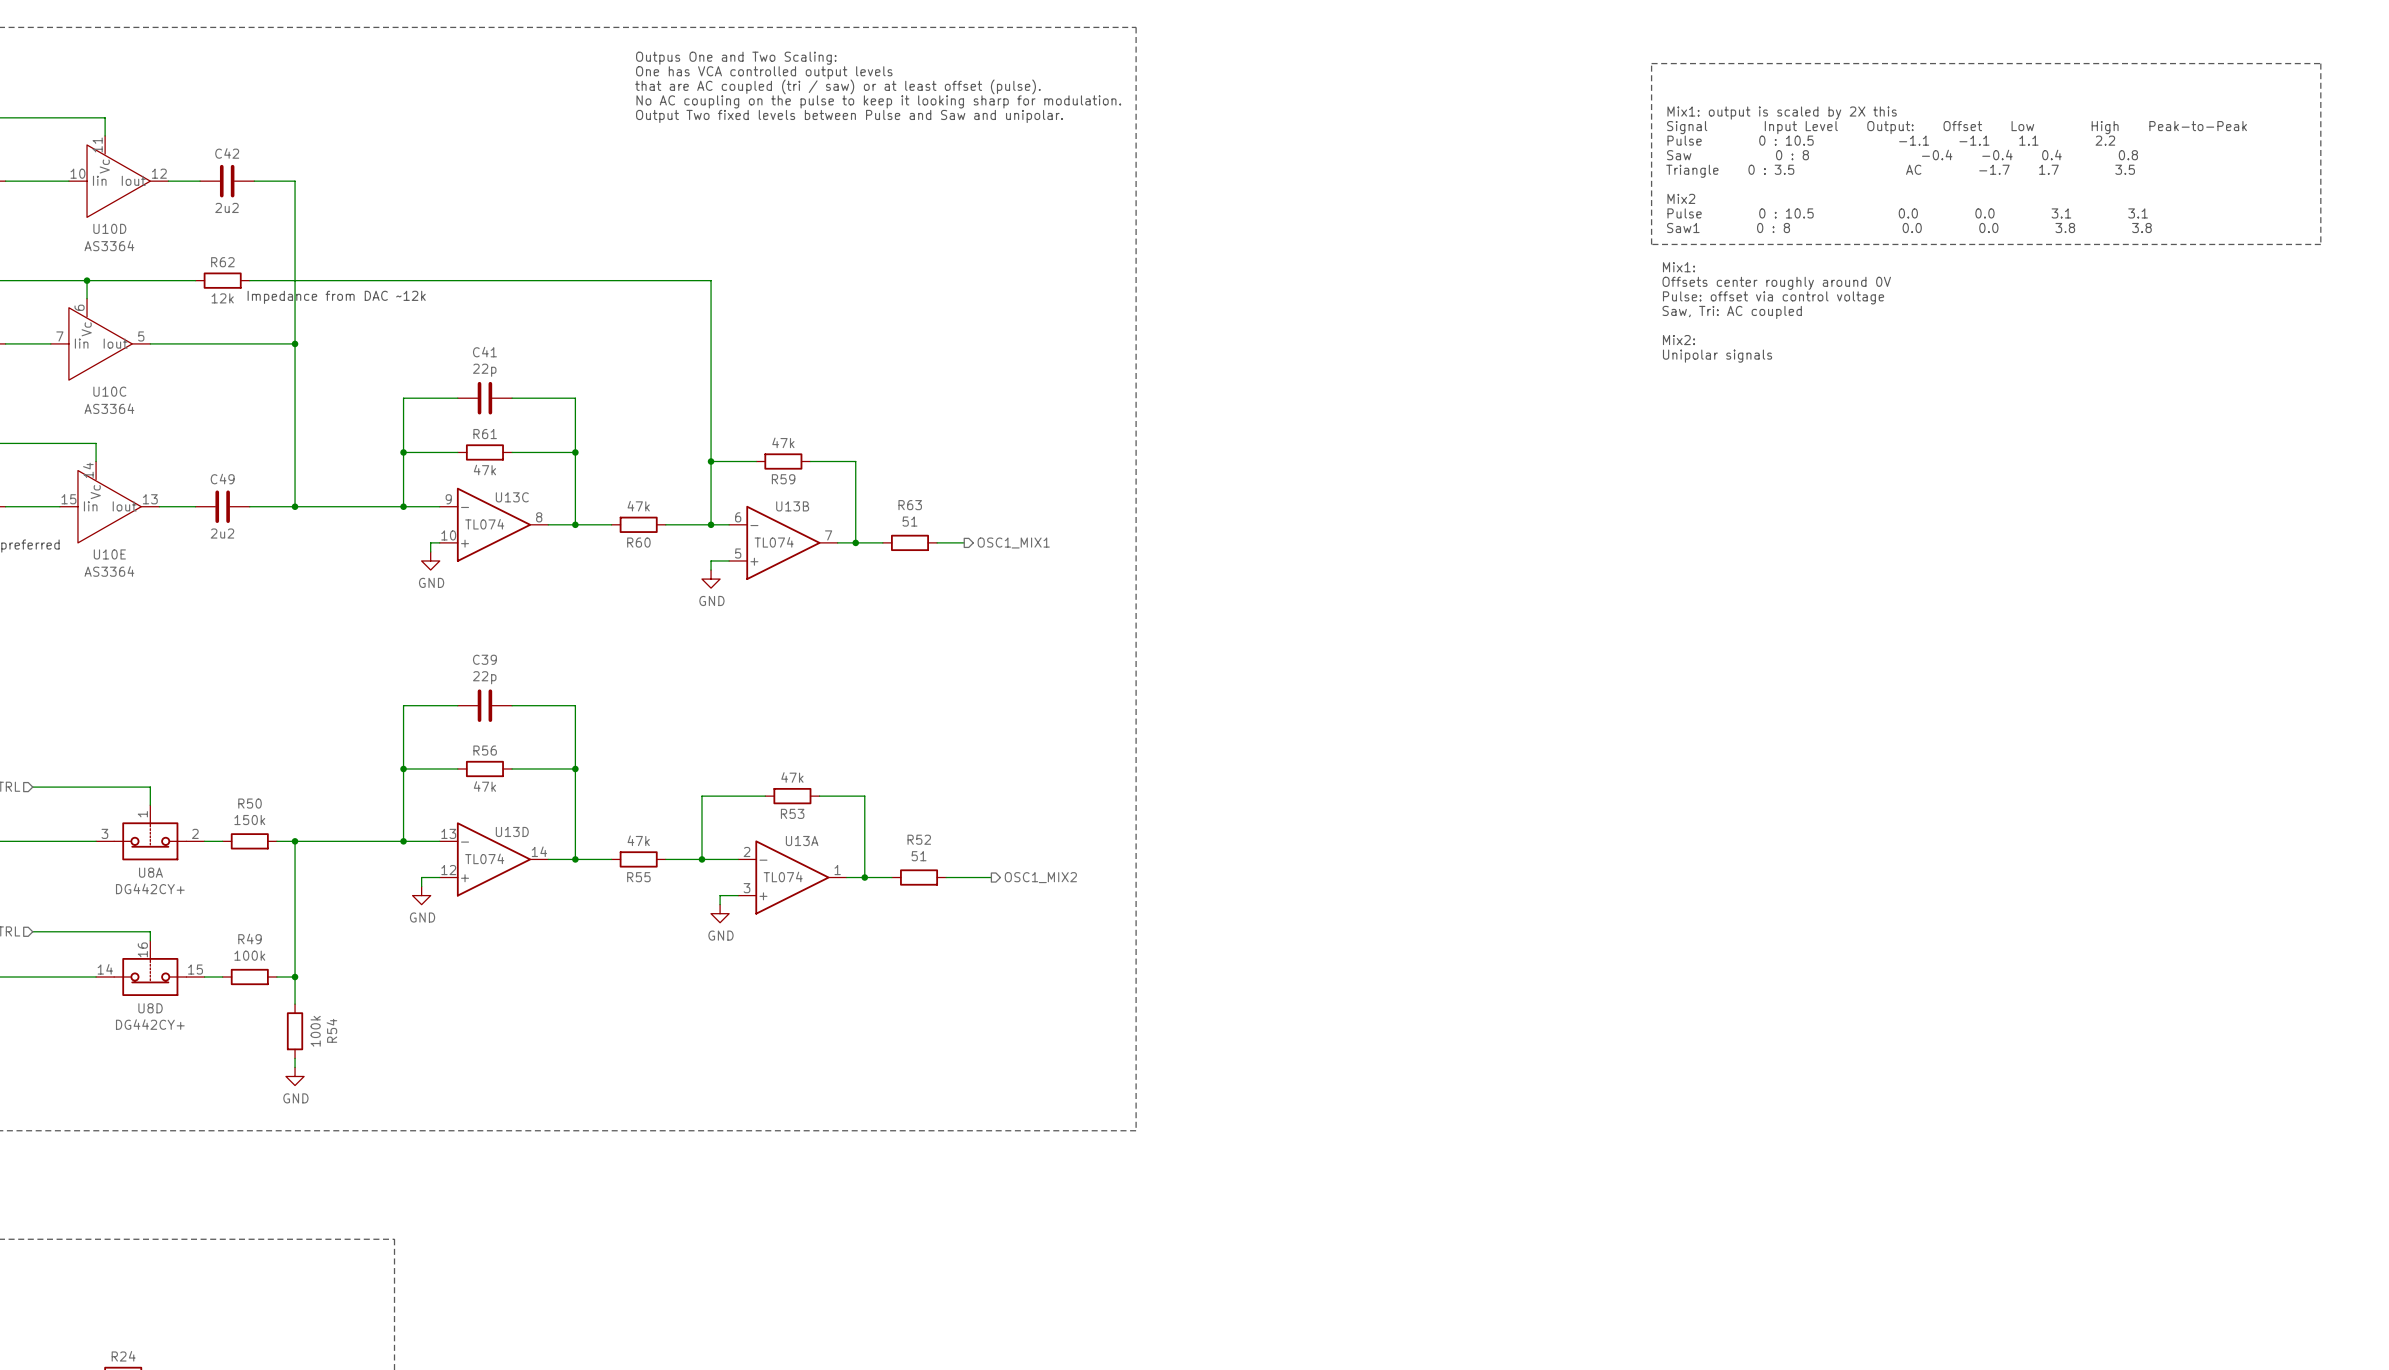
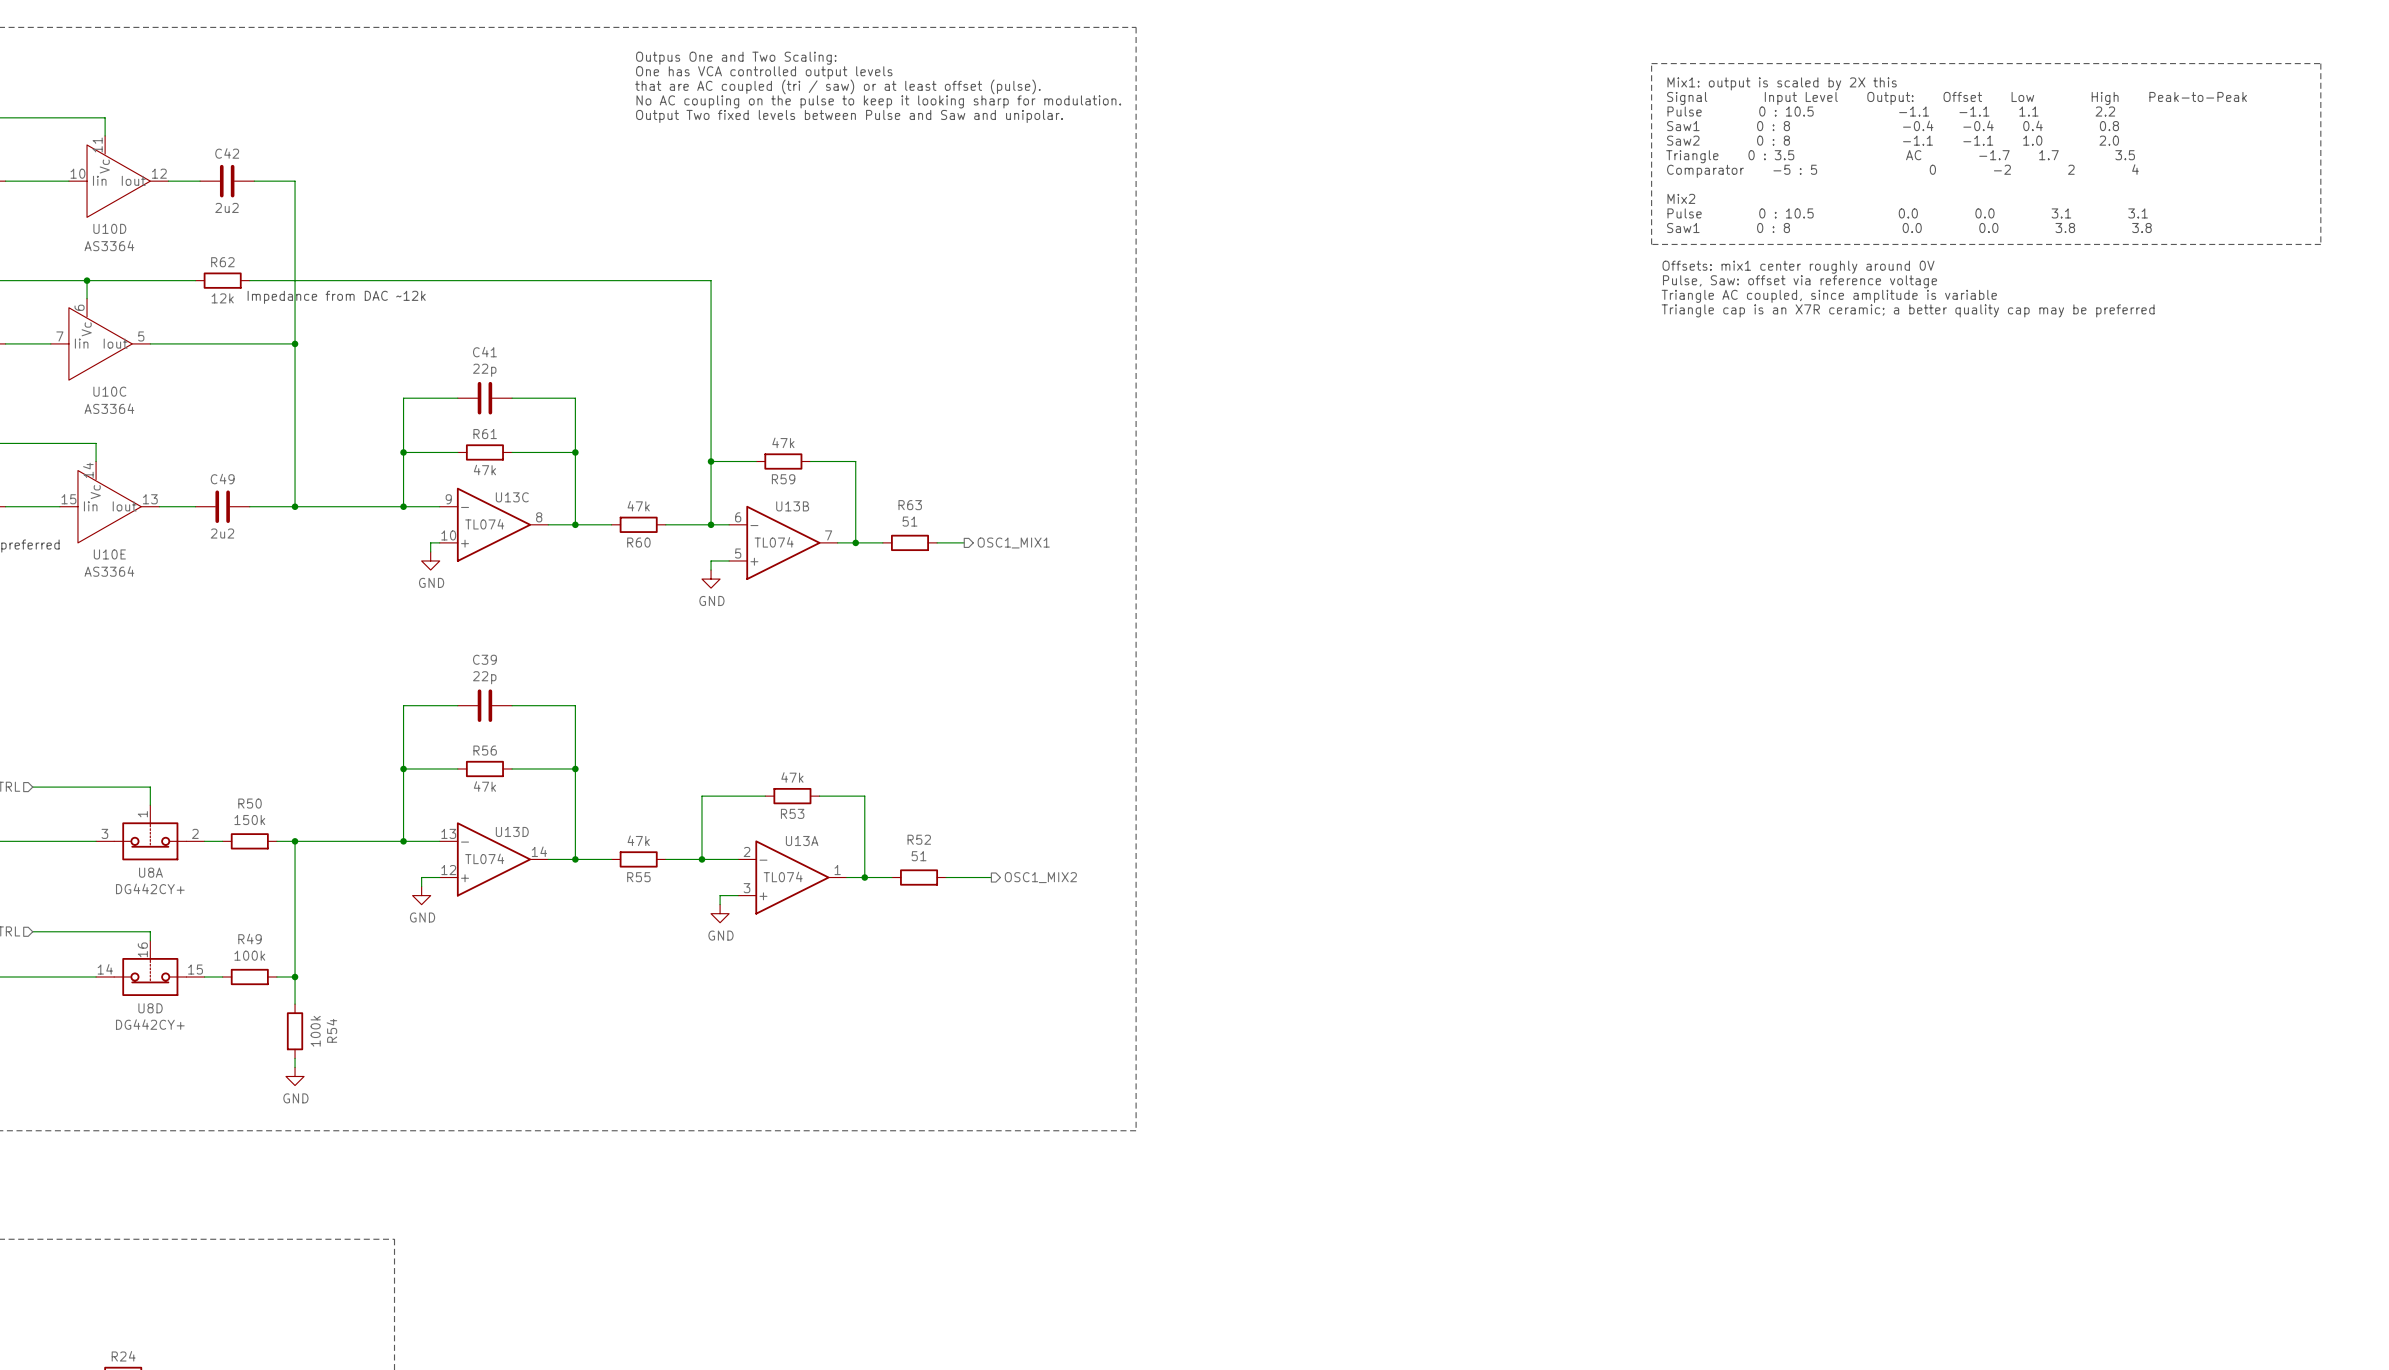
text: none -> Mix1: output is scaled by 2X this (1782, 83)
text: none -> Signal Input Level Output: Offset Low High Peak-to-Peak (1956, 98)
text: Mix1: output is scaled by 2X this (1782, 113) -> Pulse 0 : 10.5 -1.1 -1.1 1.1 2.2 (1891, 111)
text: Signal Input Level Output: Offset Low High Peak-to-Peak (1956, 127) -> Saw1 0 : 8 -0.4 -0.4 0.4 0.8 (1893, 125)
text: Pulse 0 : 10.5 -1.1 -1.1 1.1 2.2 (1891, 140) -> Saw2 0 : 8 -1.1 -1.1 1.0 2.0 (1893, 140)
text: Saw 0 : 8 -0.4 -0.4 0.4 0.8 (1902, 154) -> Triangle 0 : 3.5 AC -1.7 1.7 3.5 (1900, 156)
text: Triangle 0 : 3.5 AC -1.7 1.7 3.5 (1900, 171) -> Comparator -5 : 5 0 -2 2 4 (1902, 171)
text: Mix1: (1679, 267) -> Offsets: mix1 center roughly around 0V (1798, 267)
text: Offsets center roughly around 0V (1776, 283) -> Pulse, Saw: offset via reference voltage (1800, 281)
text: Pulse: offset via control voltage (1773, 297) -> Triangle AC coupled, since amplitude is variable (1829, 296)
text: Saw, Tri: AC coupled (1732, 312) -> Triangle cap is an X7R ceramic; a better quality cap may be preferred (1908, 310)
text: Mix2: (1679, 340) -> none
text: Unipolar signals (1717, 356) -> none

